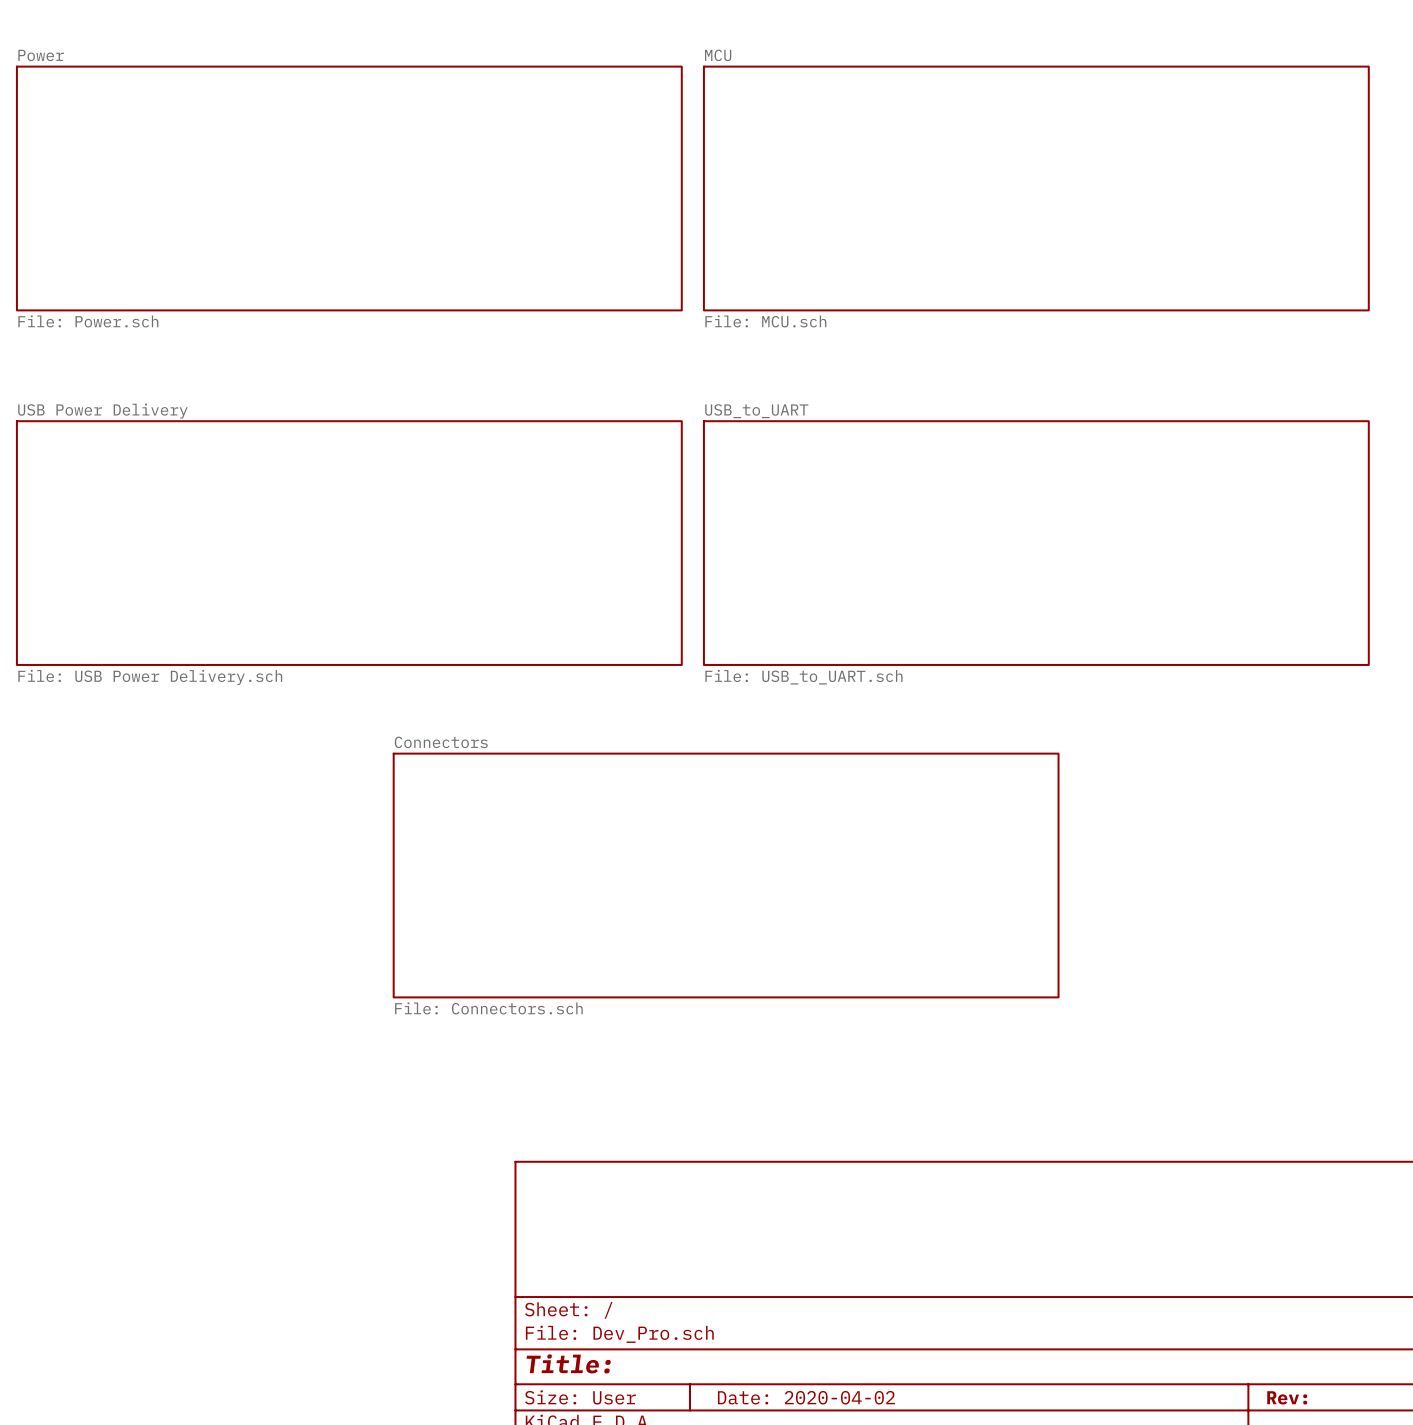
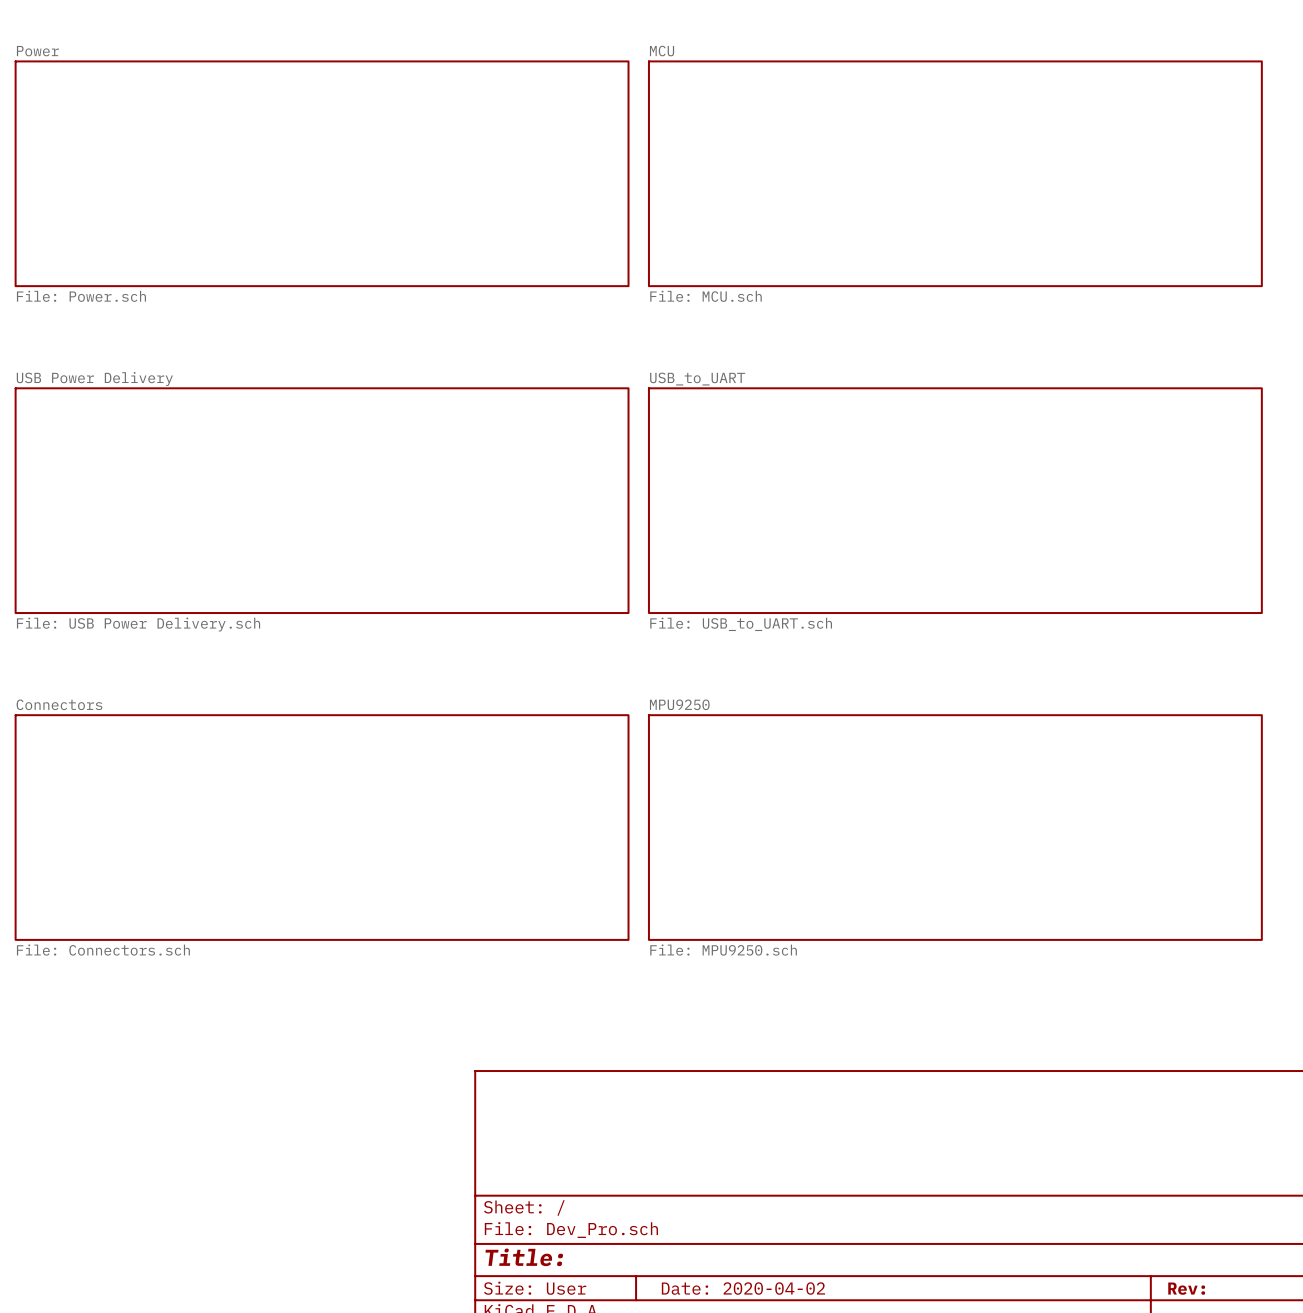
sheet Connectors: File: Connectors.sch (726, 875) -> none
sheet Connectors: none -> File: Connectors.sch (322, 827)
sheet MPU9250: none -> File: MPU9250.sch (955, 827)

